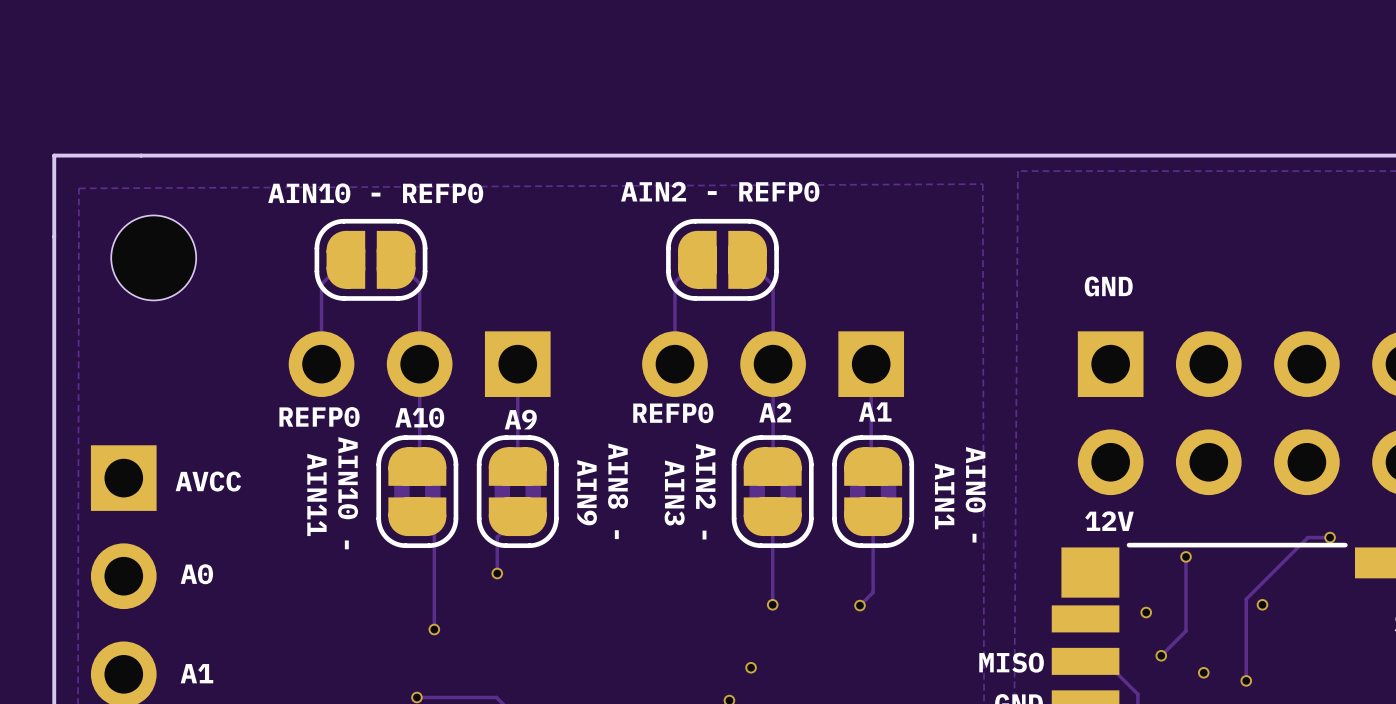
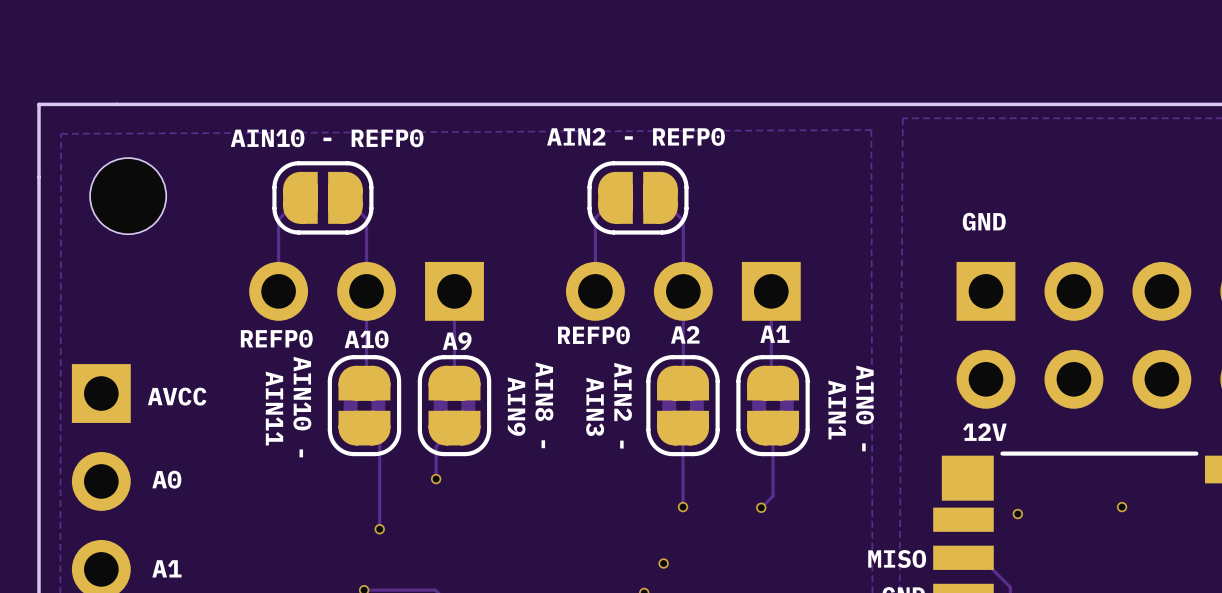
track: (1330, 537) (1307, 537) (1246, 599) (1246, 680) -> none
via: (1330, 537) -> none
track: (1186, 556) (1186, 631) (1161, 655) -> none
via: (1186, 556) -> none
via: (1161, 655) -> none
via: (1203, 672) -> none
via: (1246, 680) -> none

